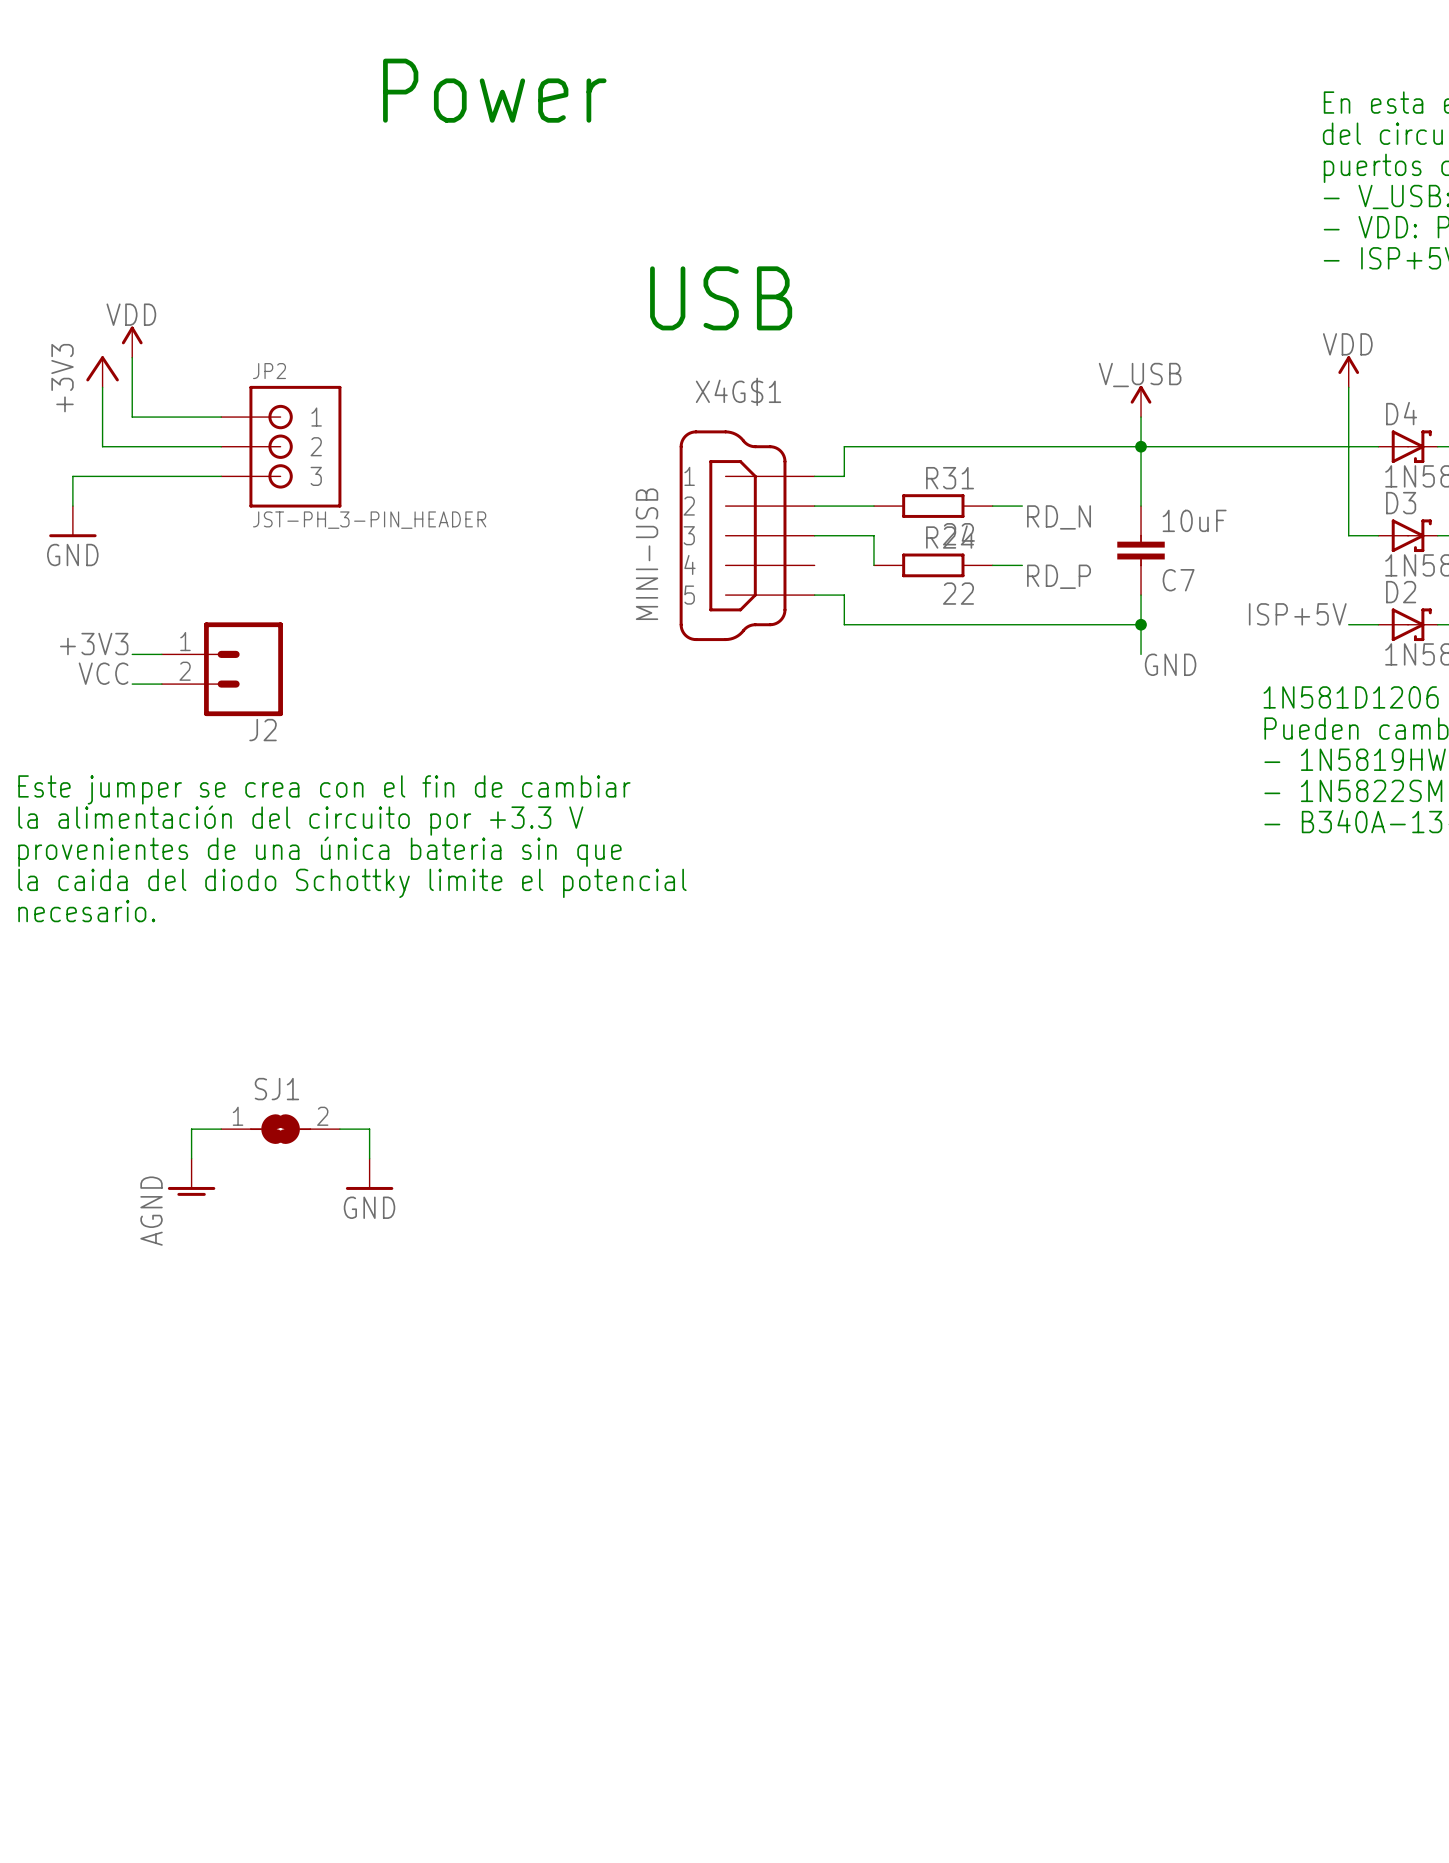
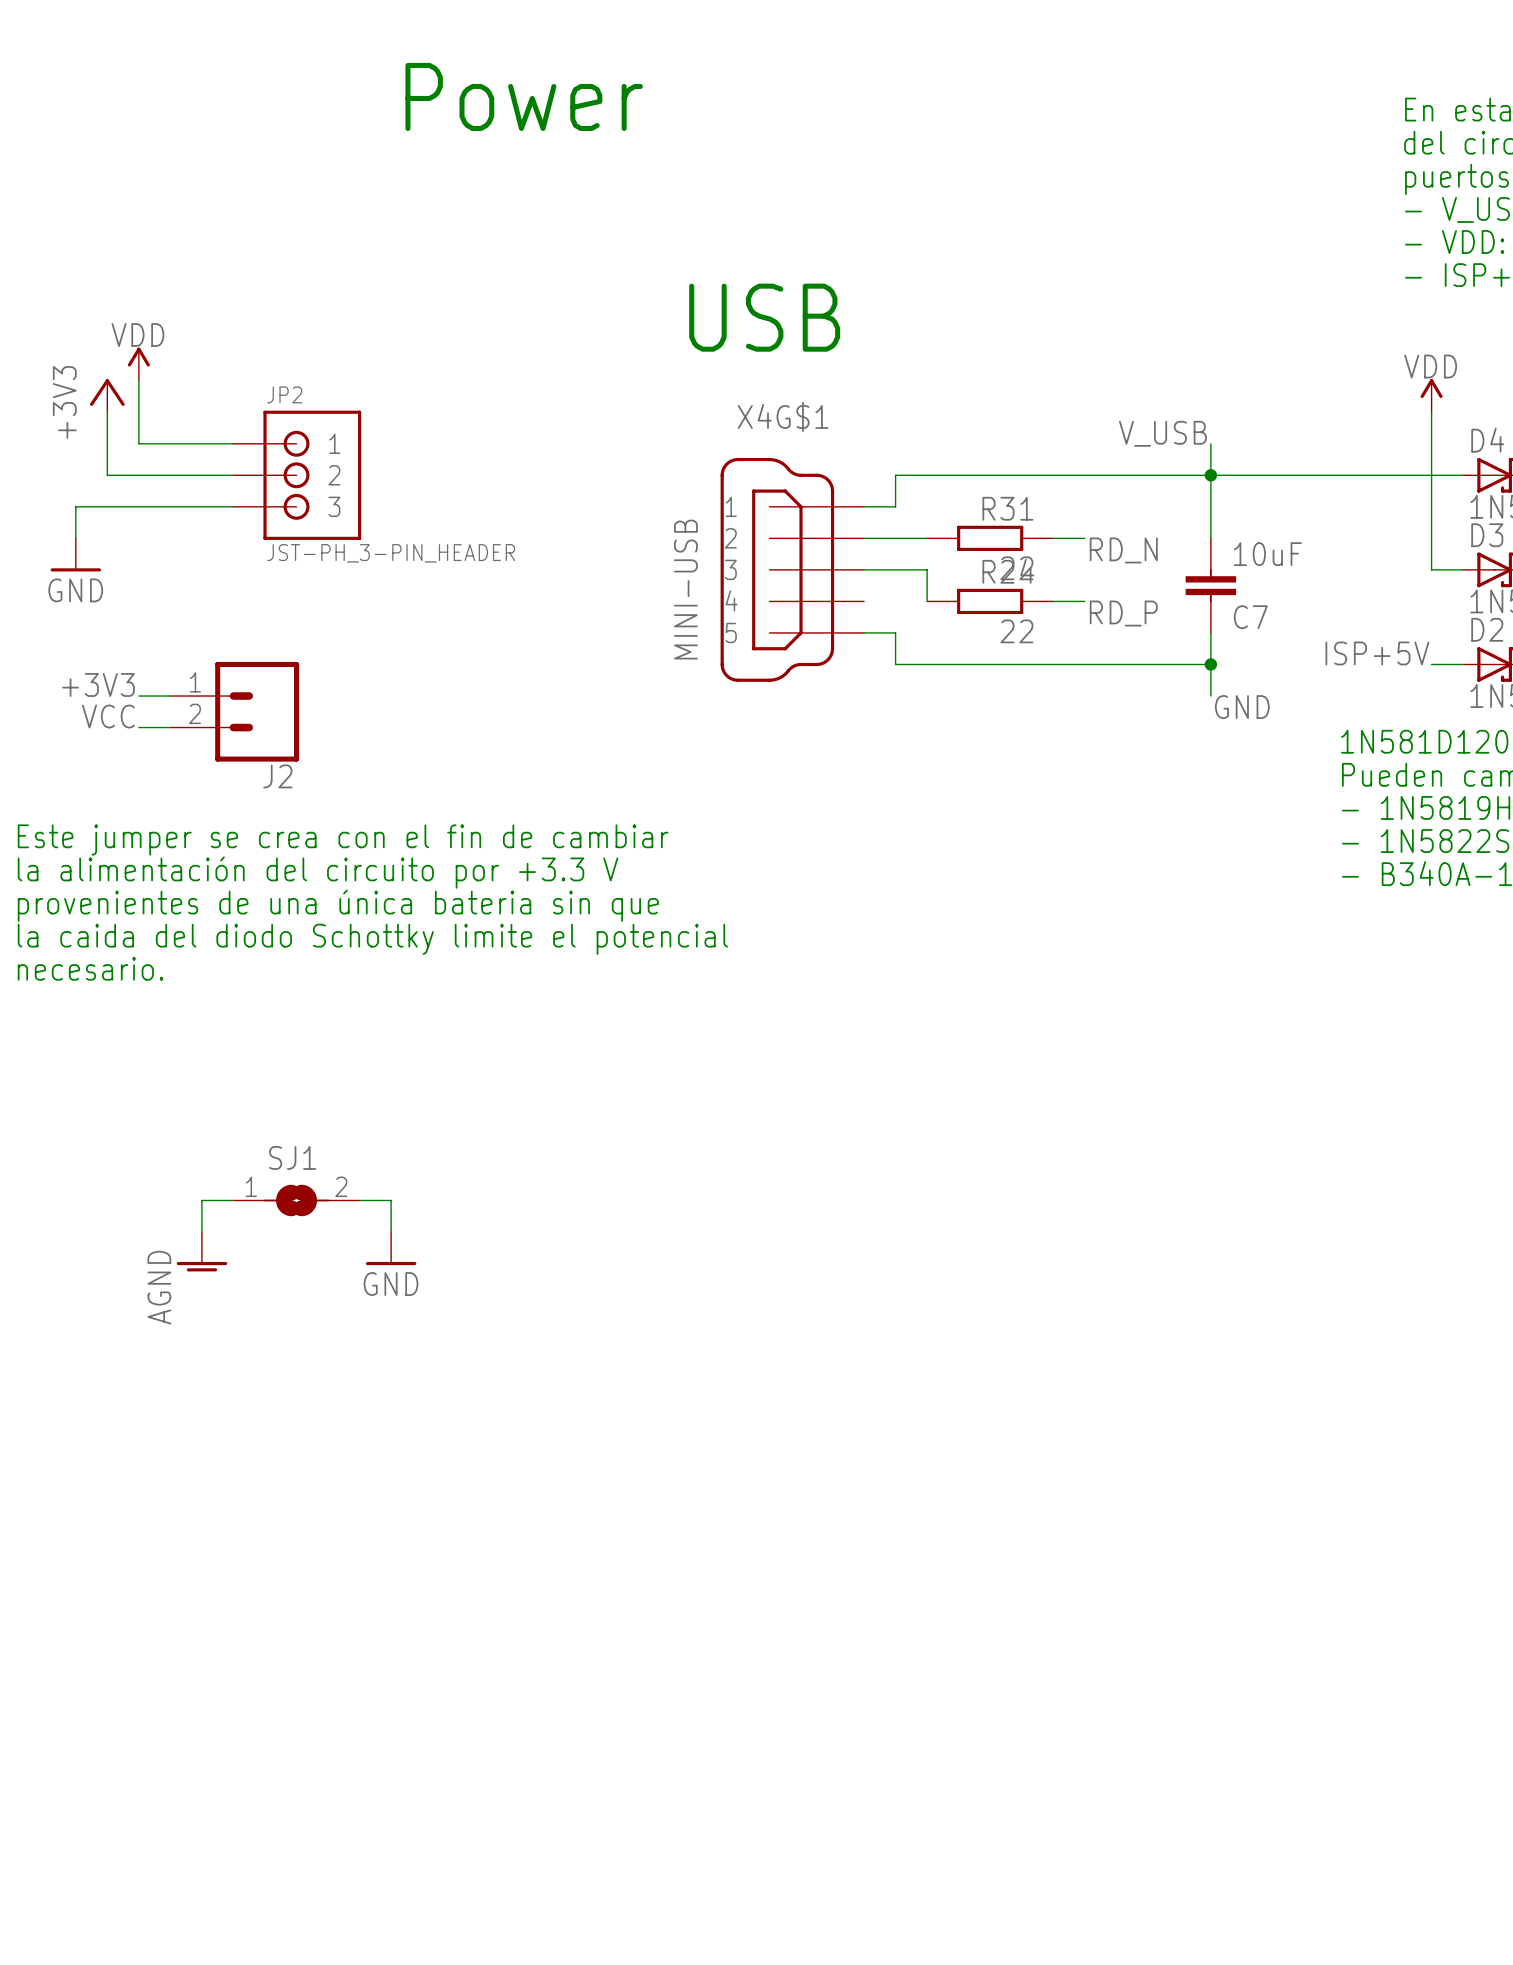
power symbol: V_USB (1141, 401) -> none
label: none -> V_USB (1162, 433)

